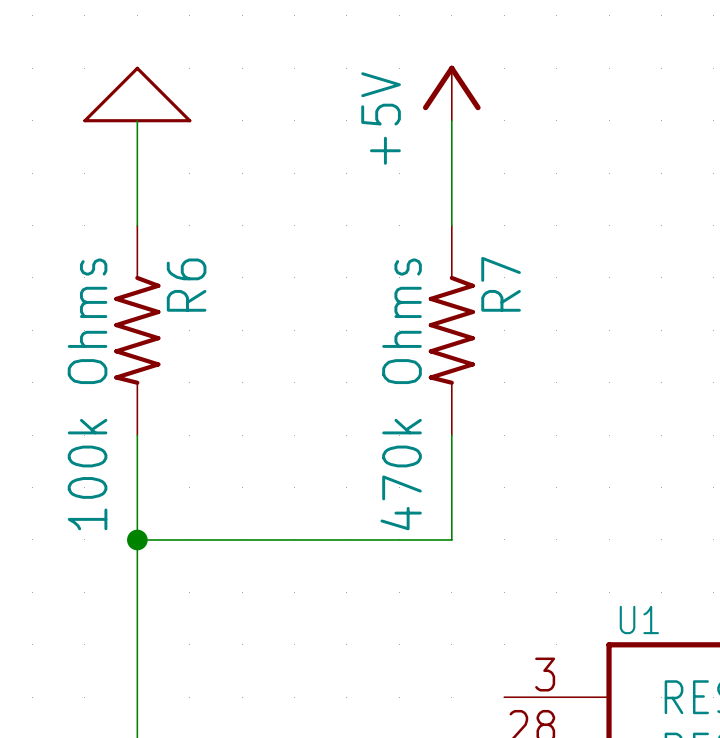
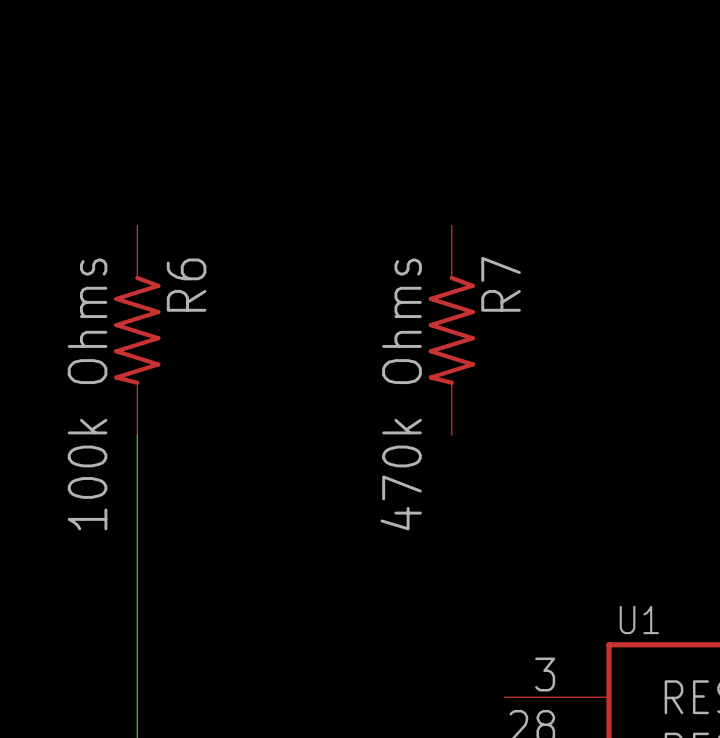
power symbol: +5V (451, 93) -> none
power symbol: (137, 94) -> none
wire: (137, 120) (137, 225) -> none
wire: (451, 120) (451, 225) -> none
wire: (451, 435) (451, 539) (137, 539) -> none
junction: (137, 539) -> none

